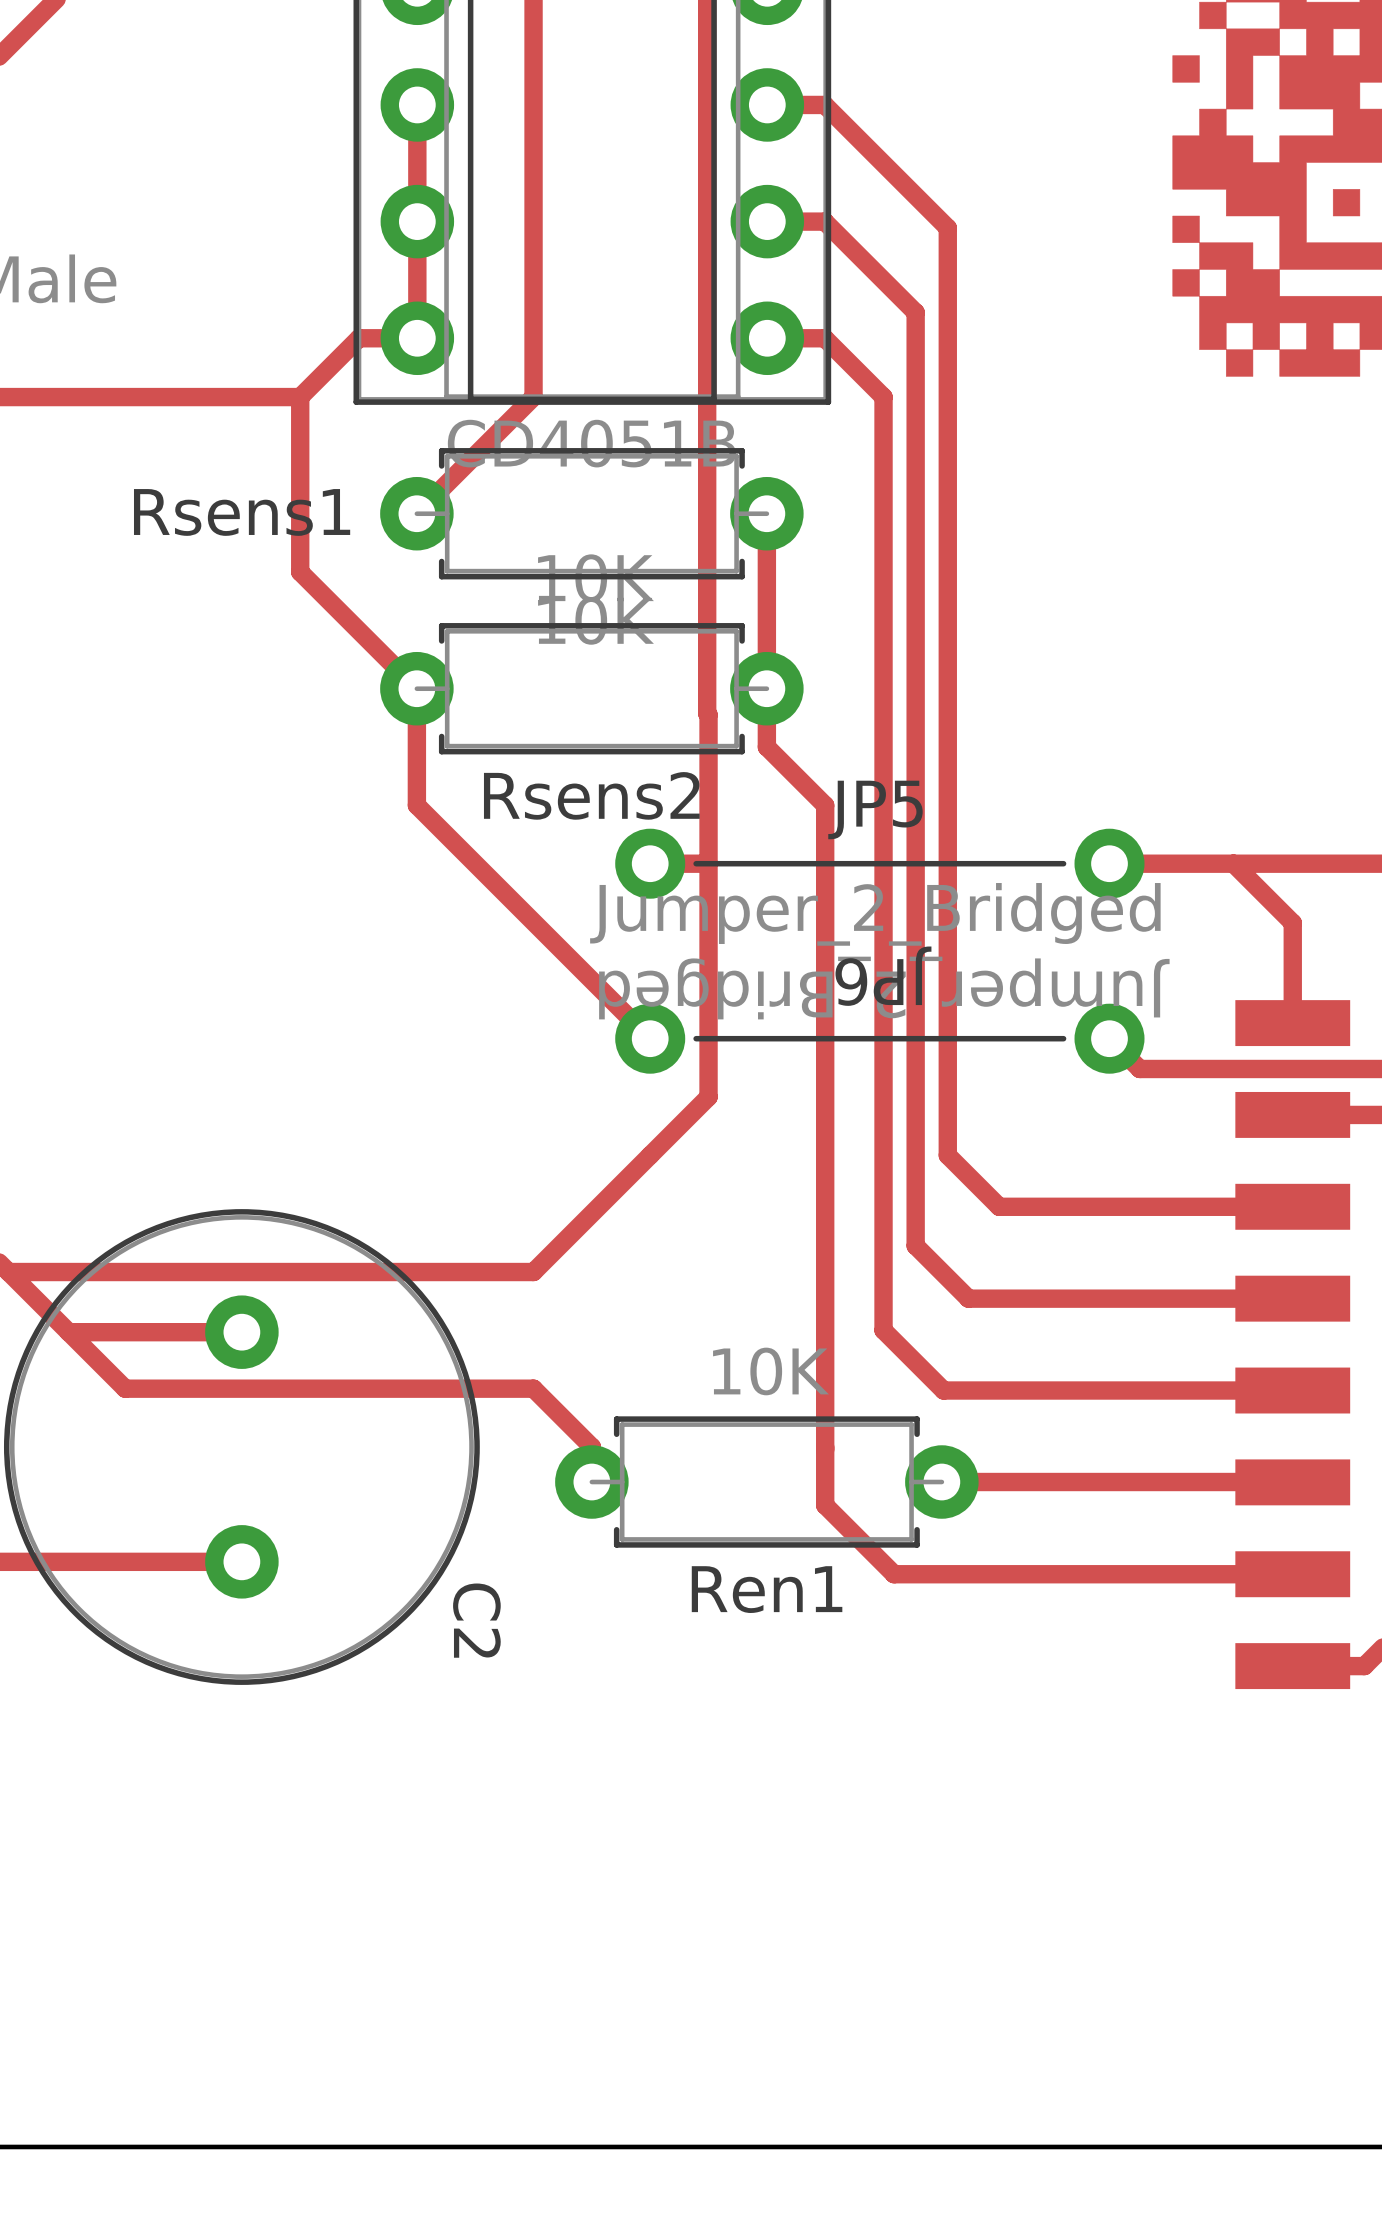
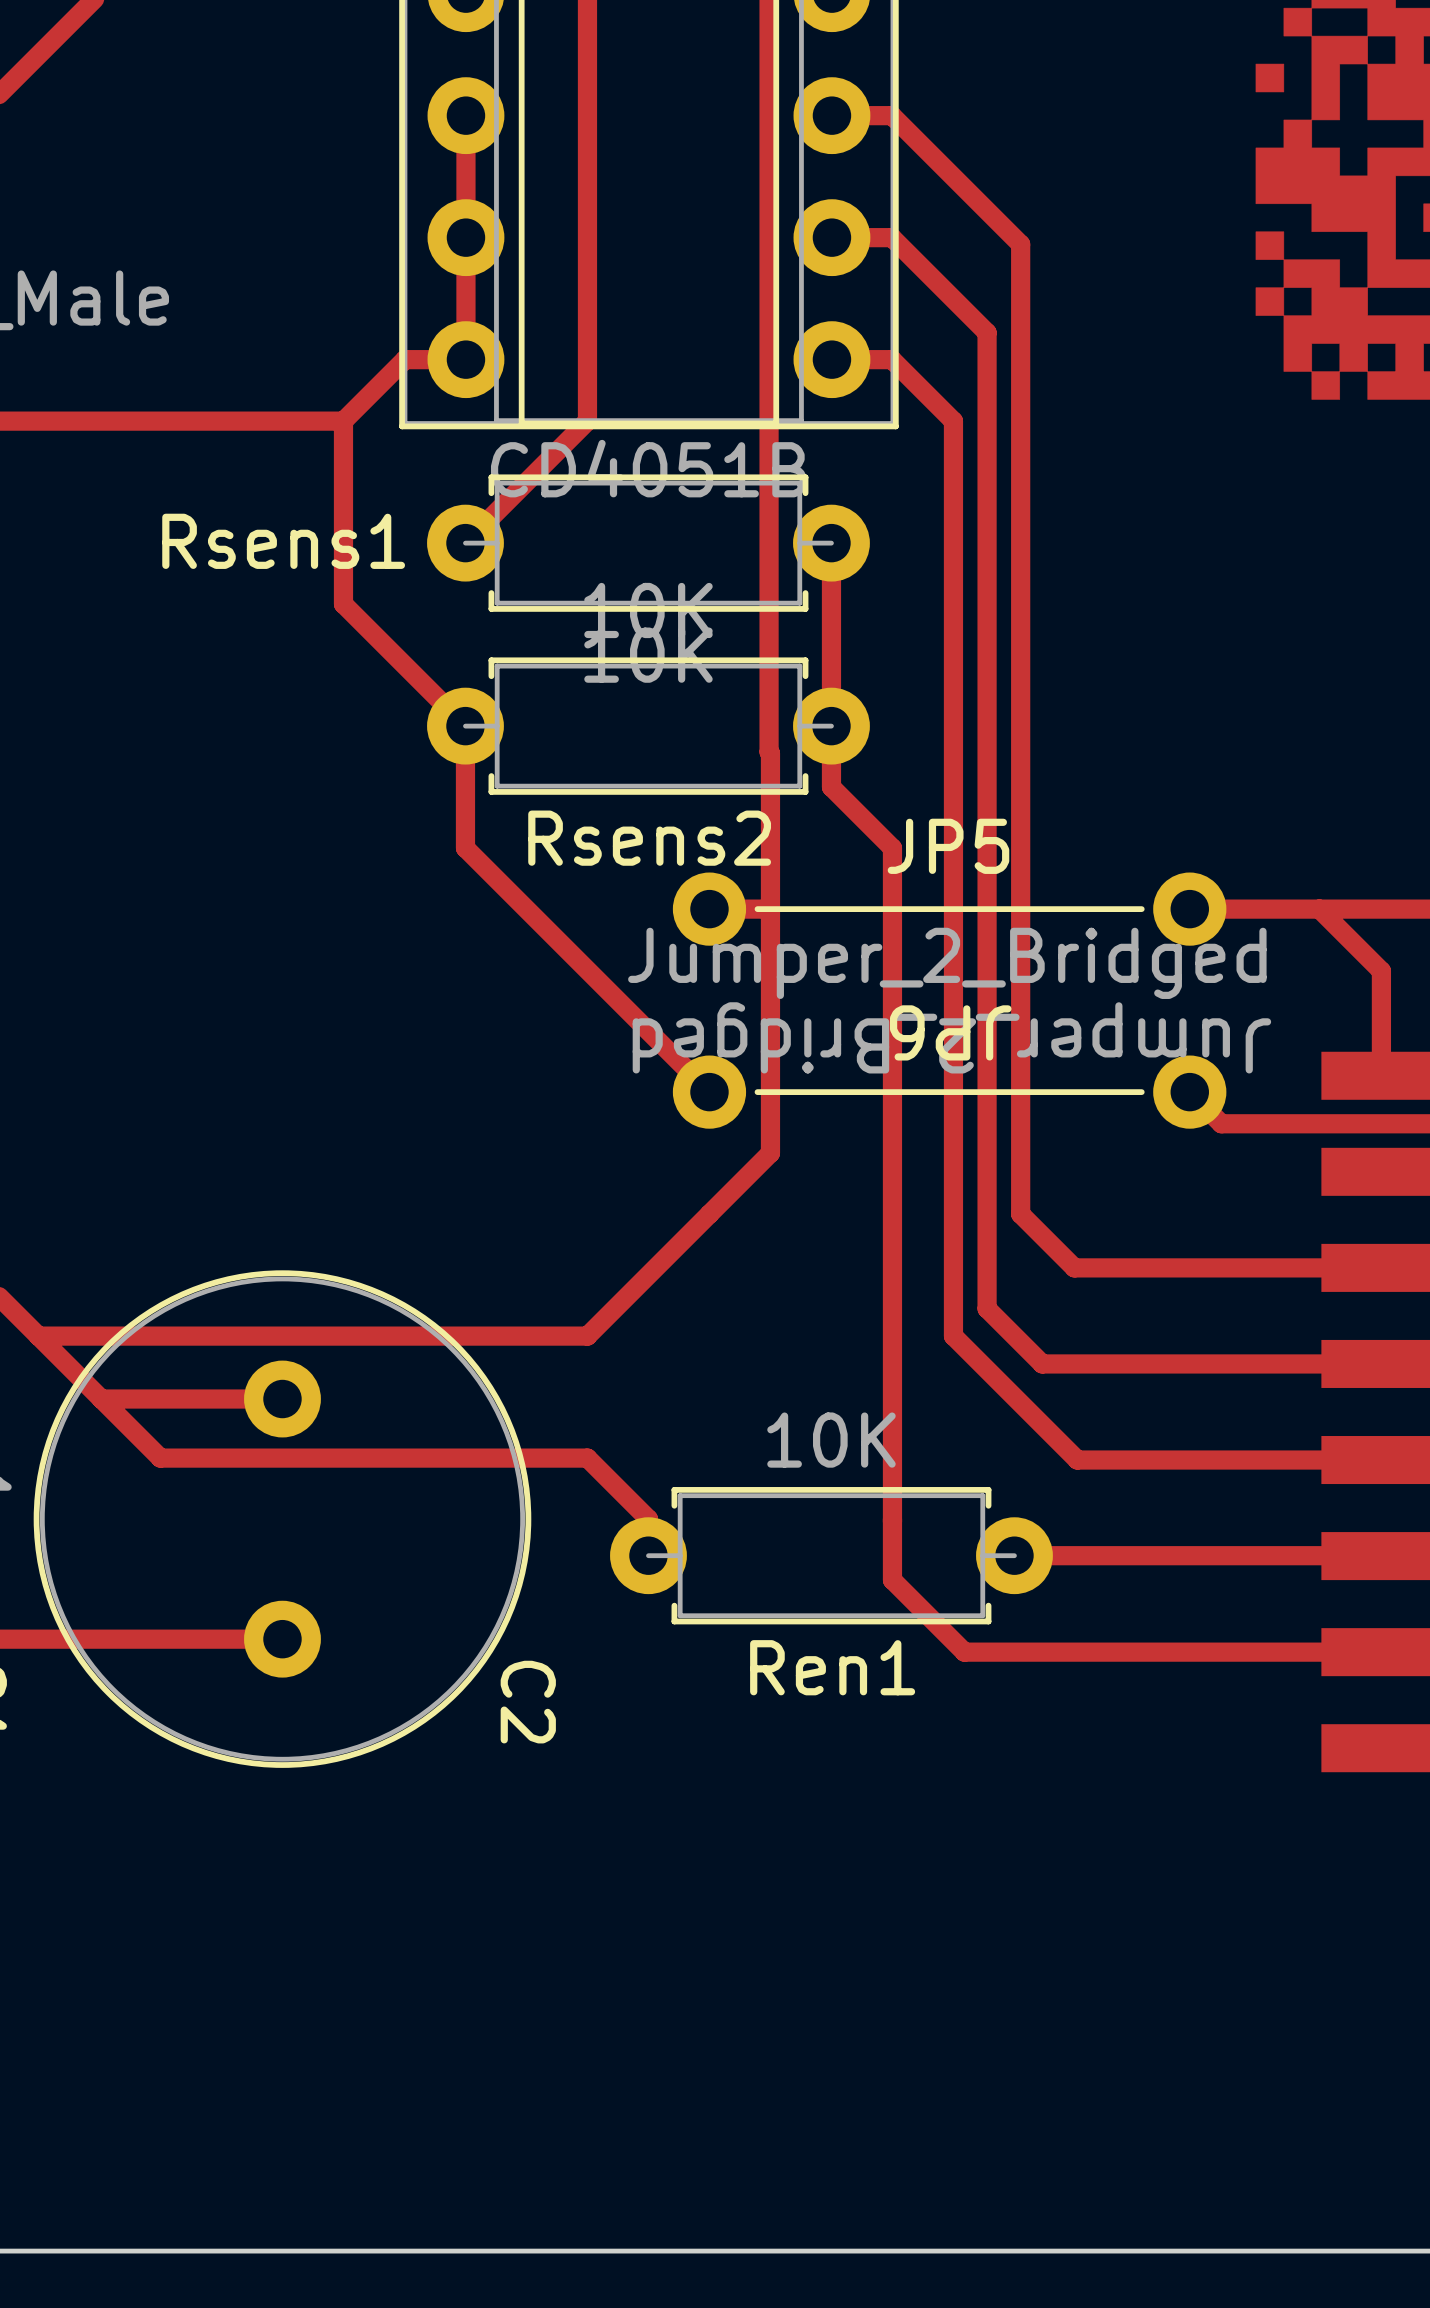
top track: (883, 1272) (883, 1330) (943, 1390) (1002, 1390) -> (953, 1336) (1077, 1460)

